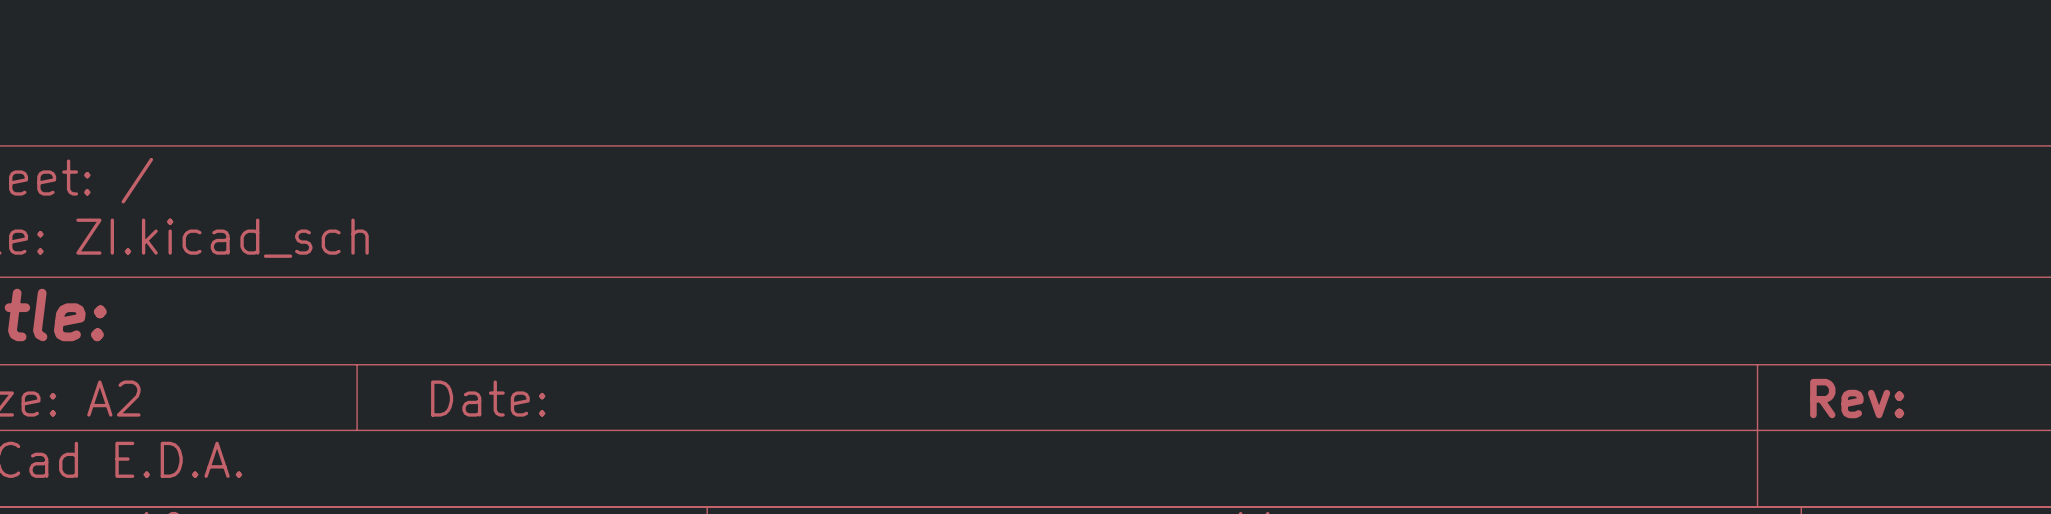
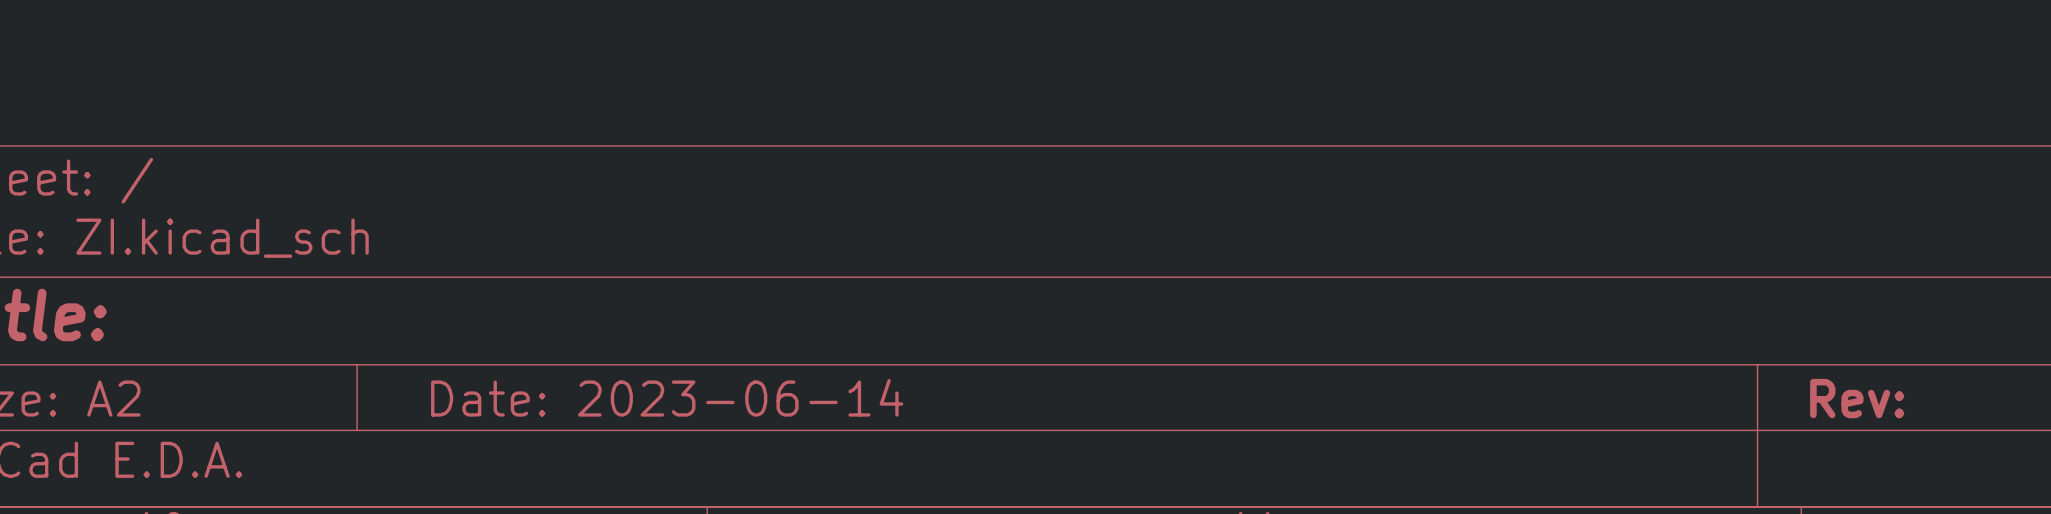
title block: Date: (488, 398) -> Date: 2023-06-14 (667, 397)

